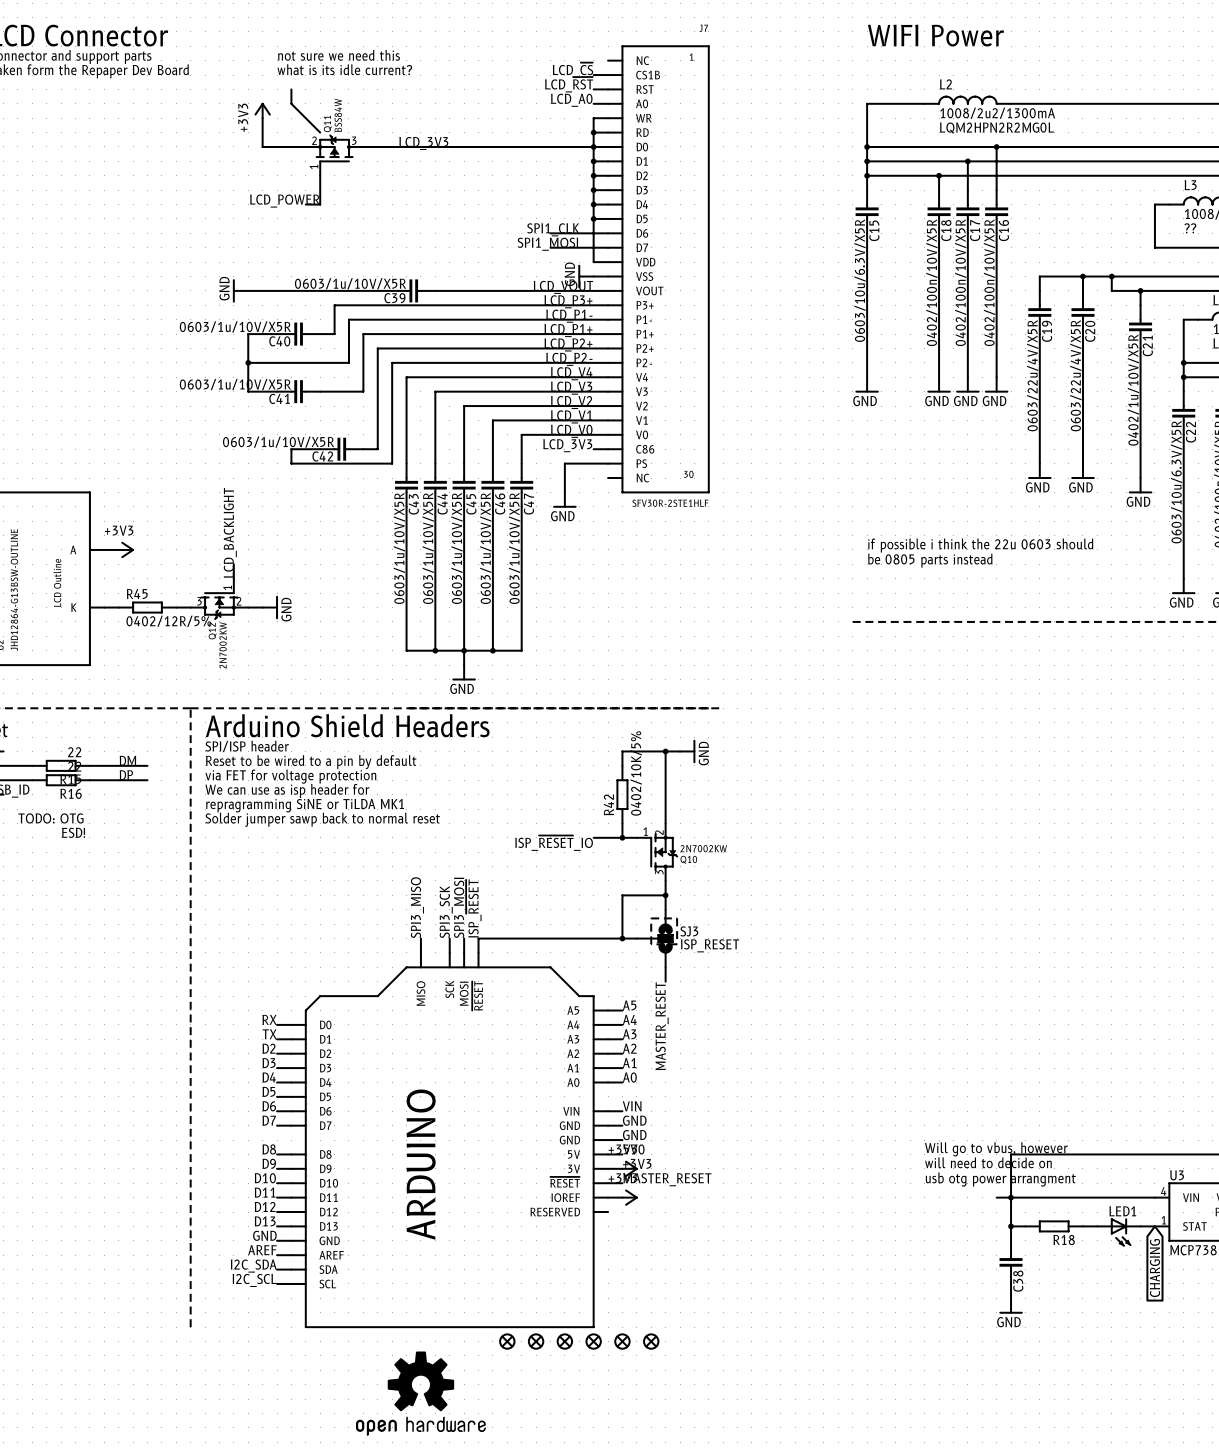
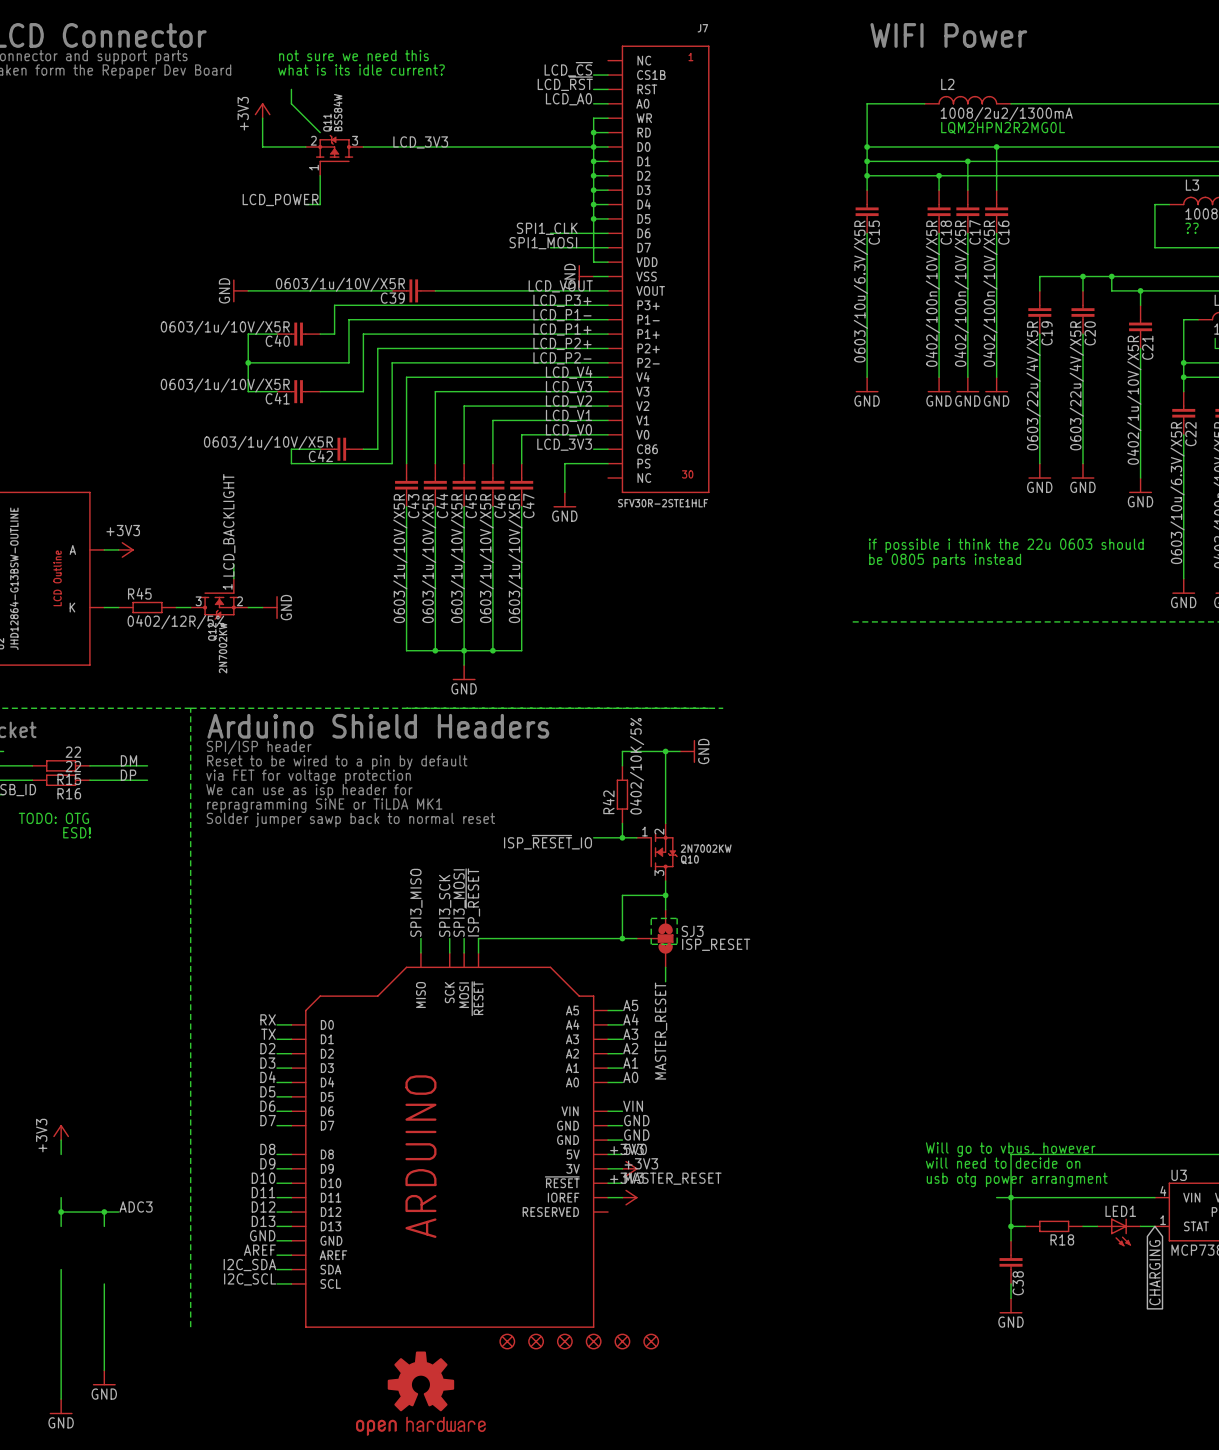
power symbol: none -> +3V3 (61, 1132)
wire: none -> (61, 1140) (61, 1154)
wire: none -> (61, 1197) (61, 1226)
label: none -> ADC3 (136, 1206)
wire: none -> (61, 1212) (118, 1212)
junction: none -> (61, 1212)
wire: none -> (104, 1212) (104, 1226)
junction: none -> (104, 1212)
wire: none -> (61, 1269) (61, 1399)
wire: none -> (104, 1283) (104, 1370)
power symbol: none -> GND (104, 1377)
power symbol: none -> GND (61, 1406)

